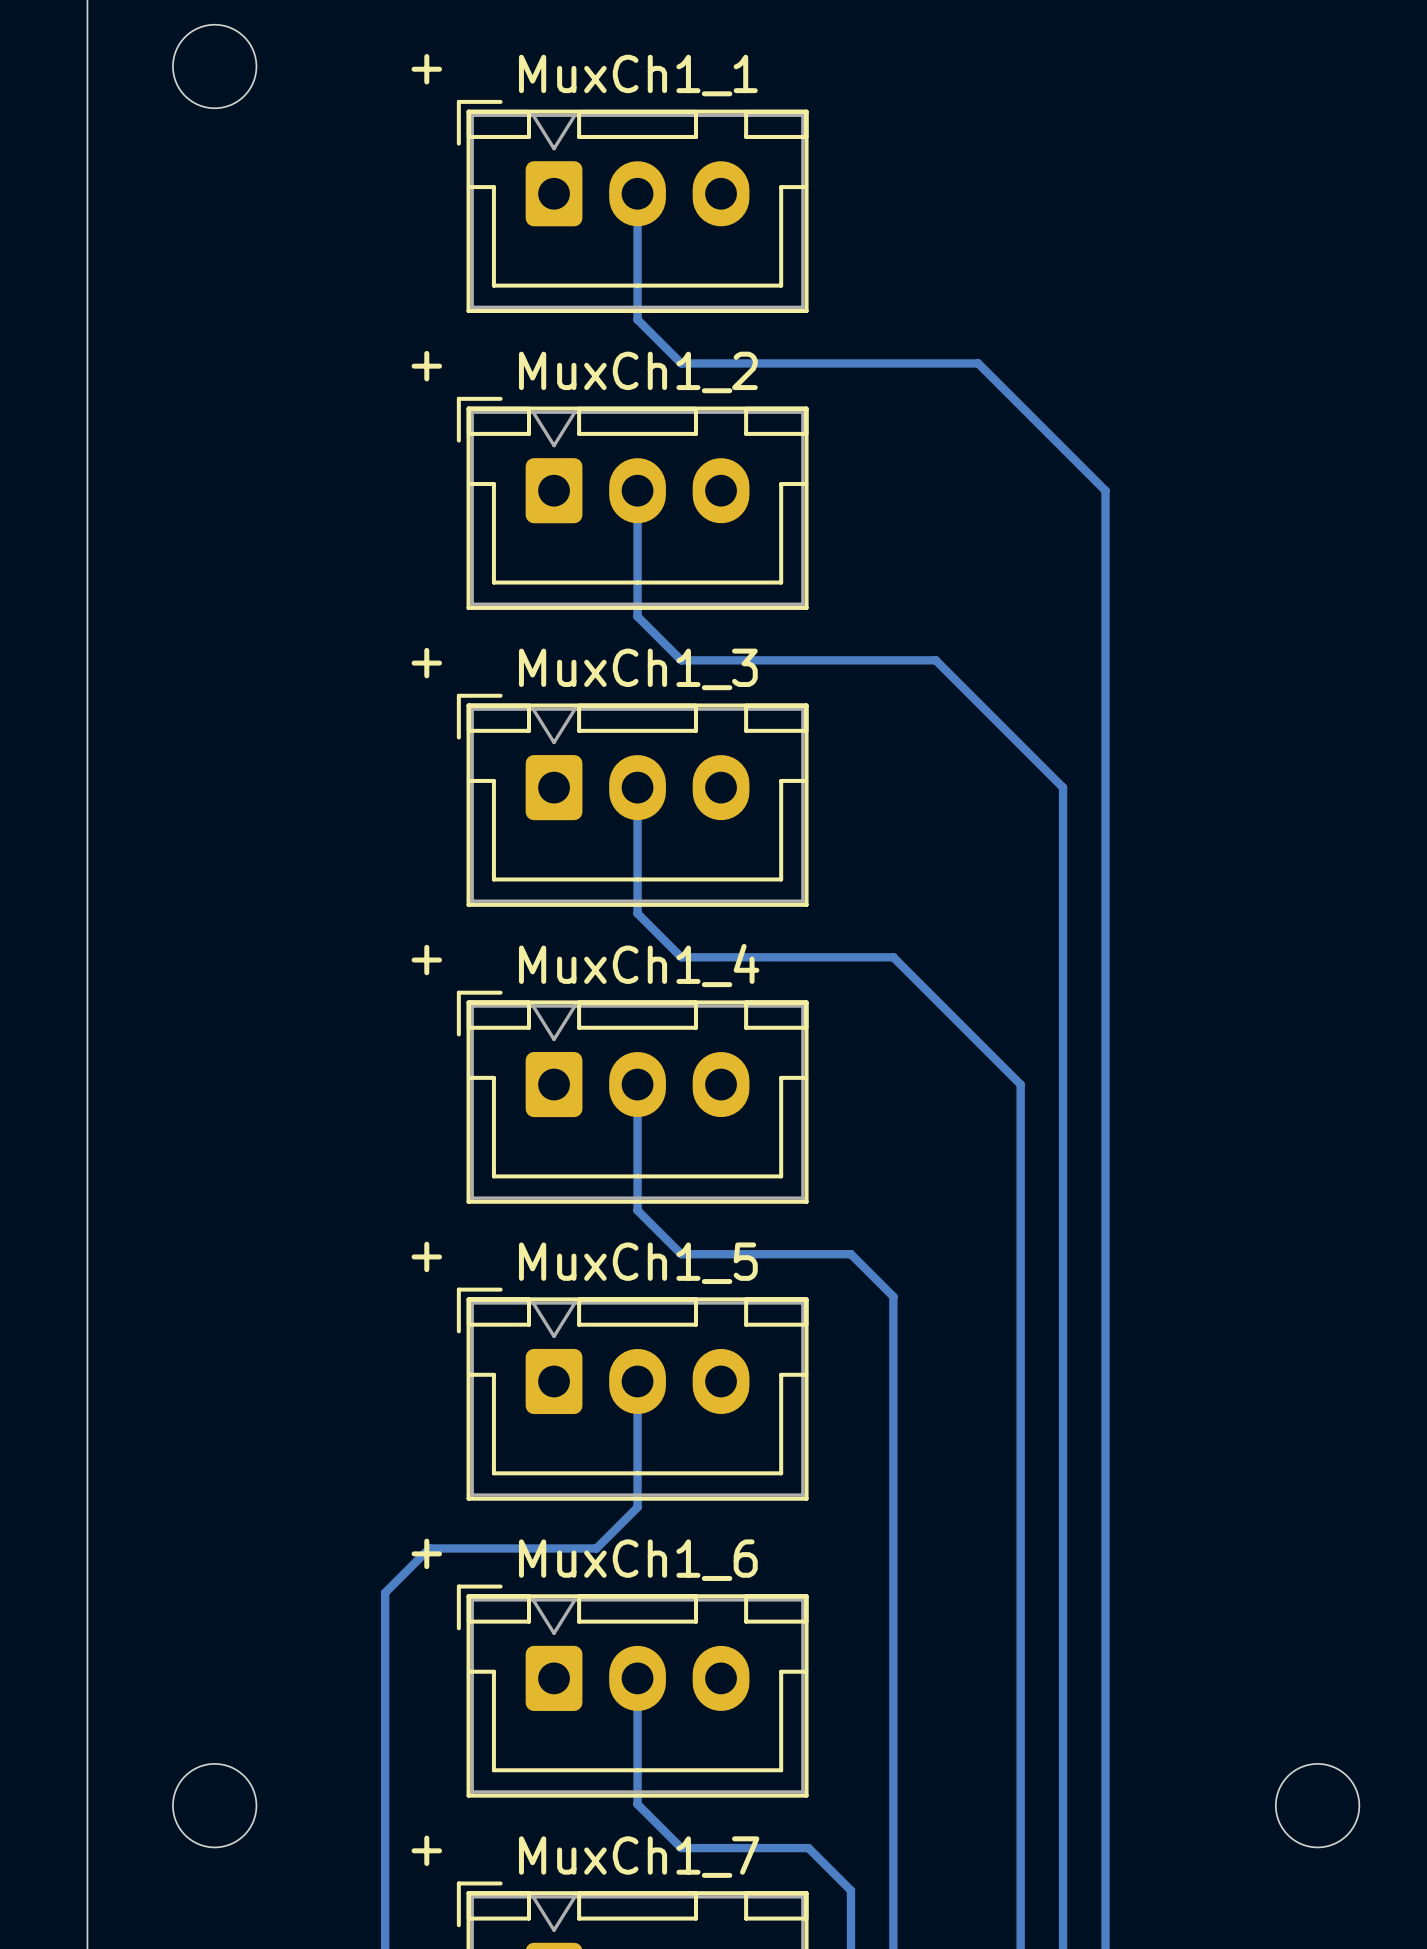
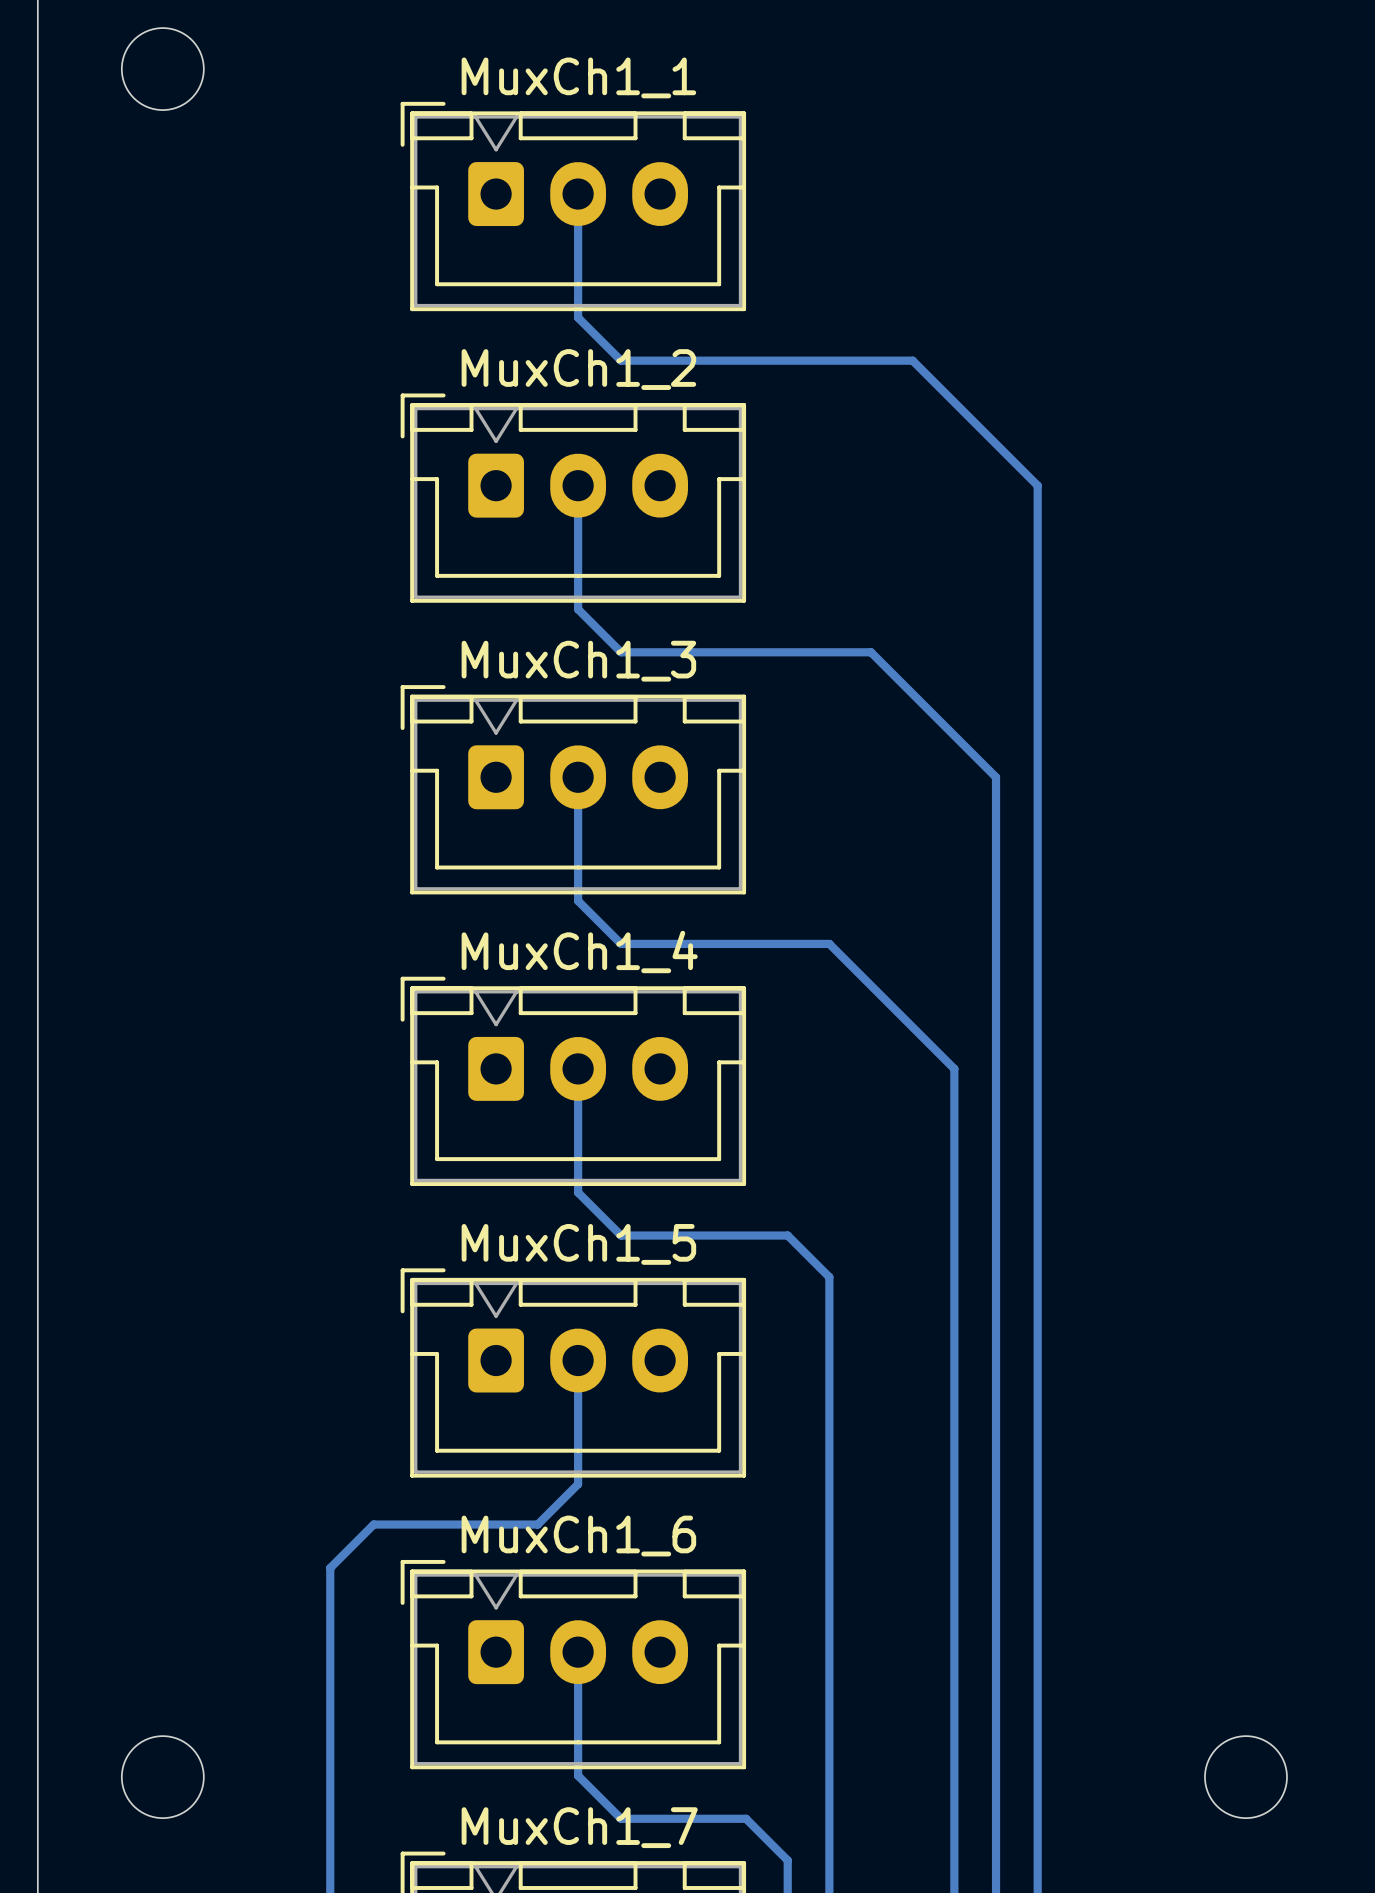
text: + (426, 69) -> none
text: + (426, 366) -> none
text: + (426, 663) -> none
text: + (426, 960) -> none
text: + (426, 1256) -> none
text: + (426, 1553) -> none
text: + (426, 1850) -> none

